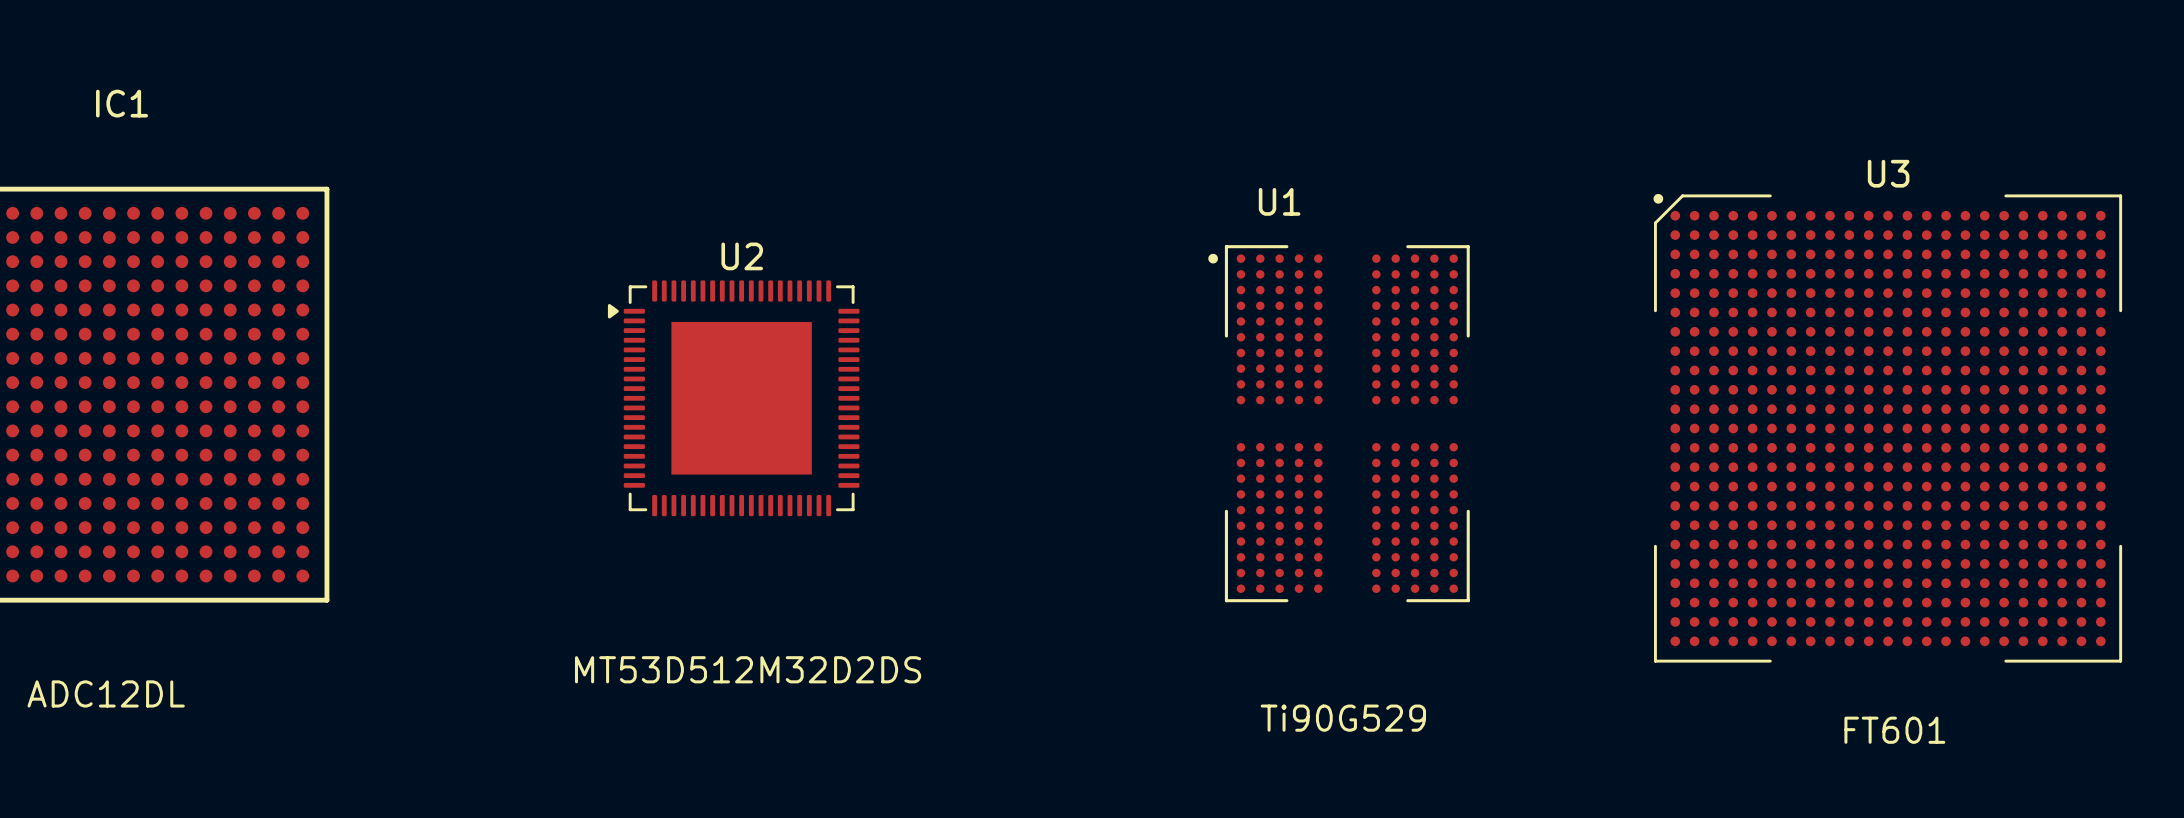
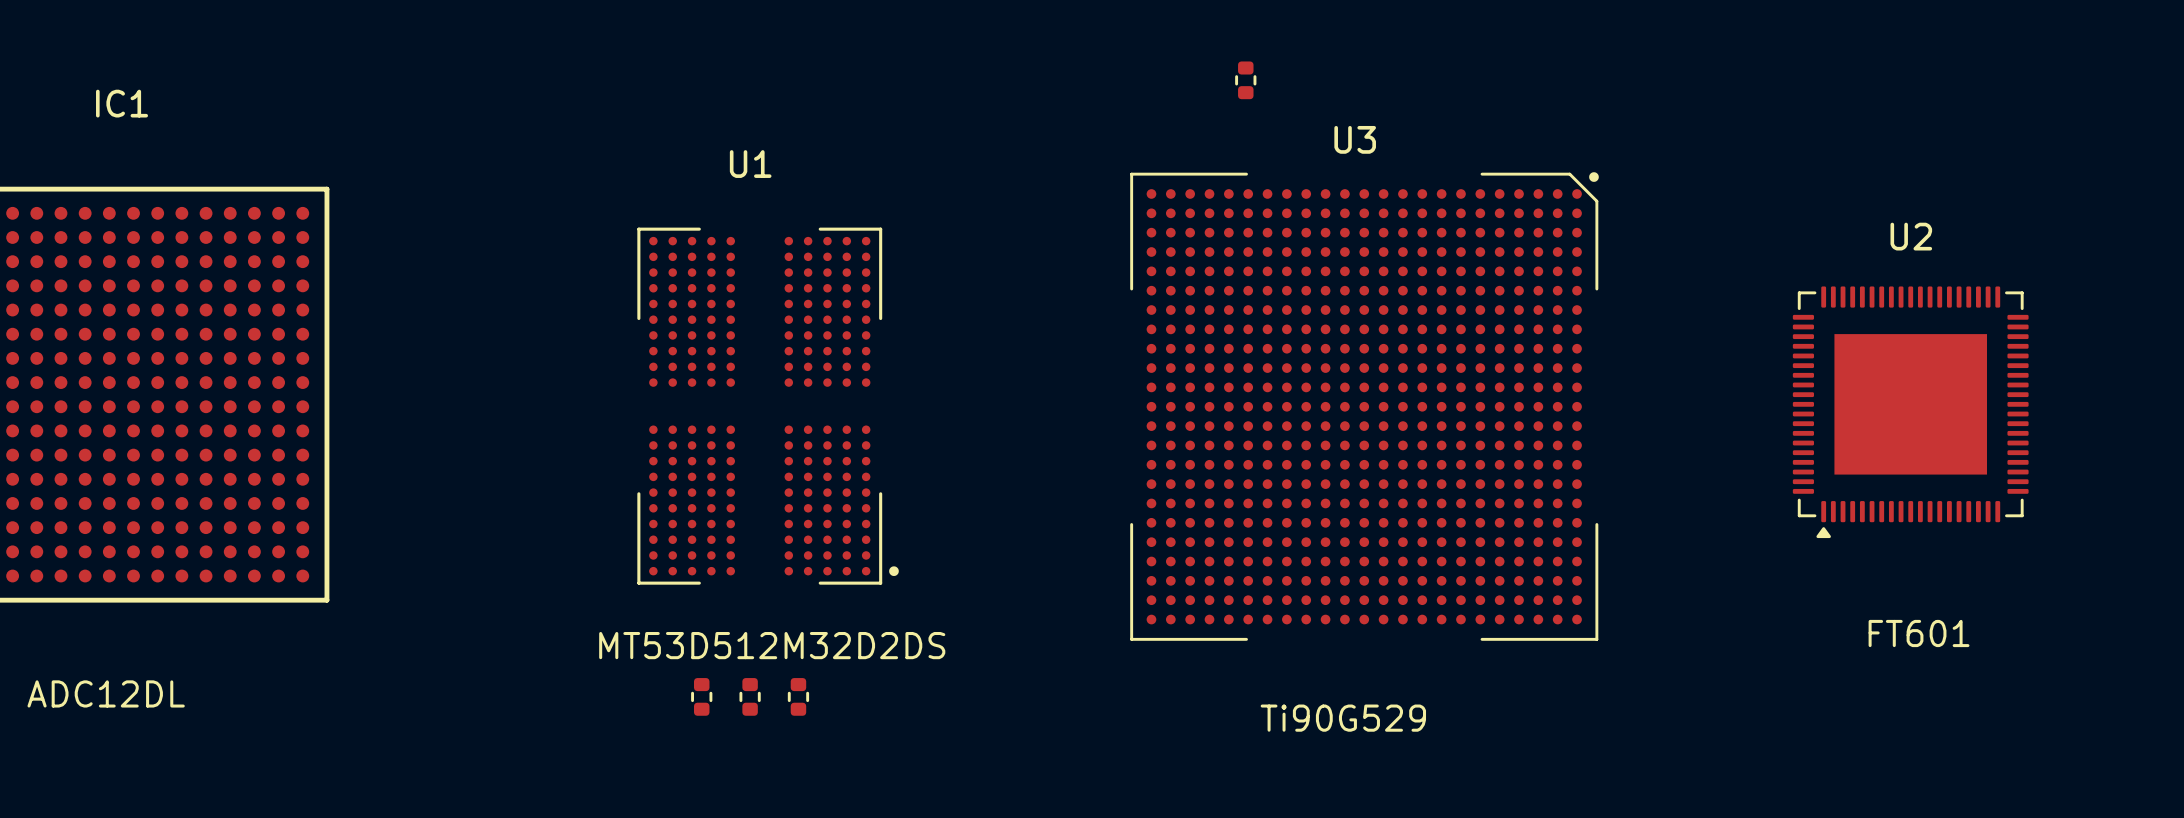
part: none -> (1245, 80)
U2 rotation: 0° (733, 398) -> 90° counterclockwise (1910, 412)
U2 position: (733, 398) -> (1910, 412)
U1 rotation: 0° (1339, 423) -> 180° (768, 406)
U1 position: (1339, 423) -> (768, 406)
U3 rotation: 0° (1887, 428) -> 90° clockwise (1364, 406)
U3 position: (1887, 428) -> (1364, 406)
text position: MT53D512M32D2DS (748, 669) -> MT53D512M32D2DS (772, 645)
part: none -> (701, 696)
part: none -> (750, 696)
part: none -> (798, 696)
text position: FT601 (1894, 730) -> FT601 (1919, 633)

